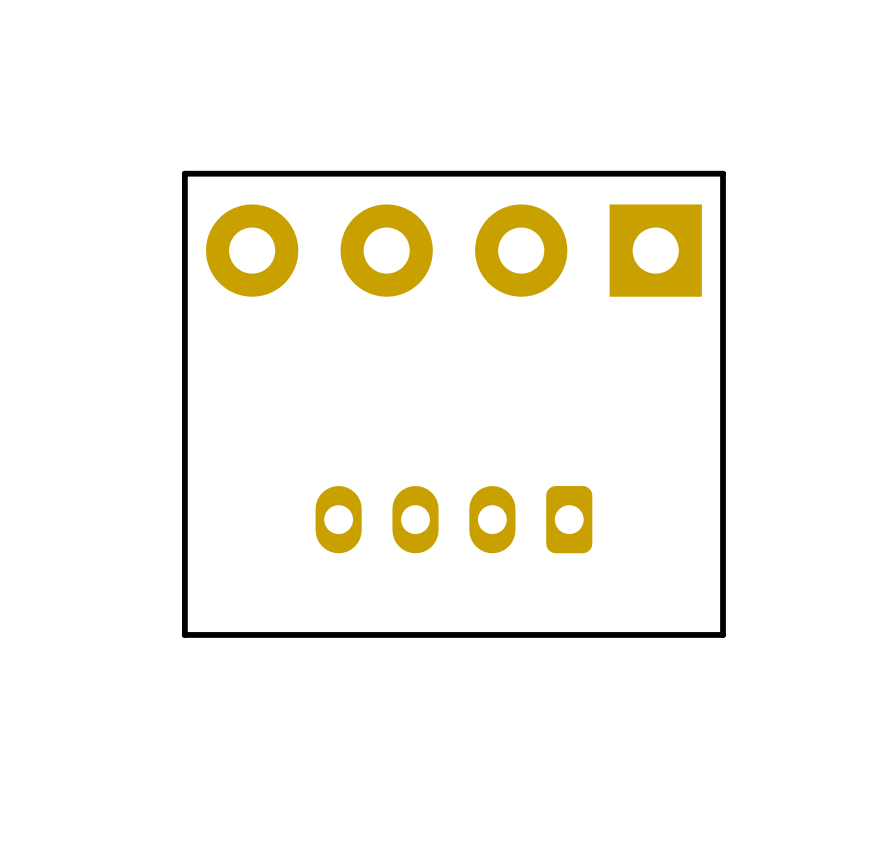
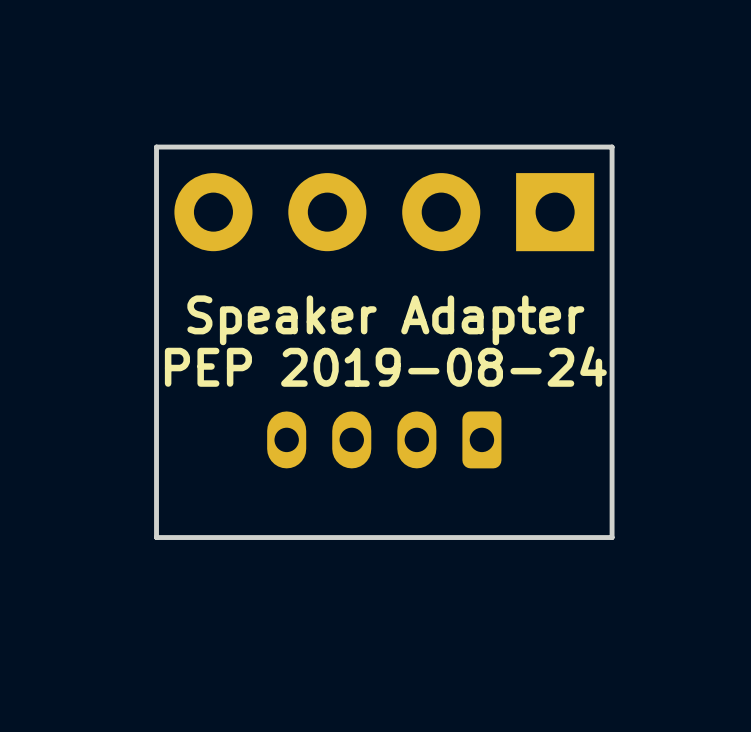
text: none -> Speaker Adapter (385, 320)
text: none -> PEP 2019-08-24 (385, 366)

